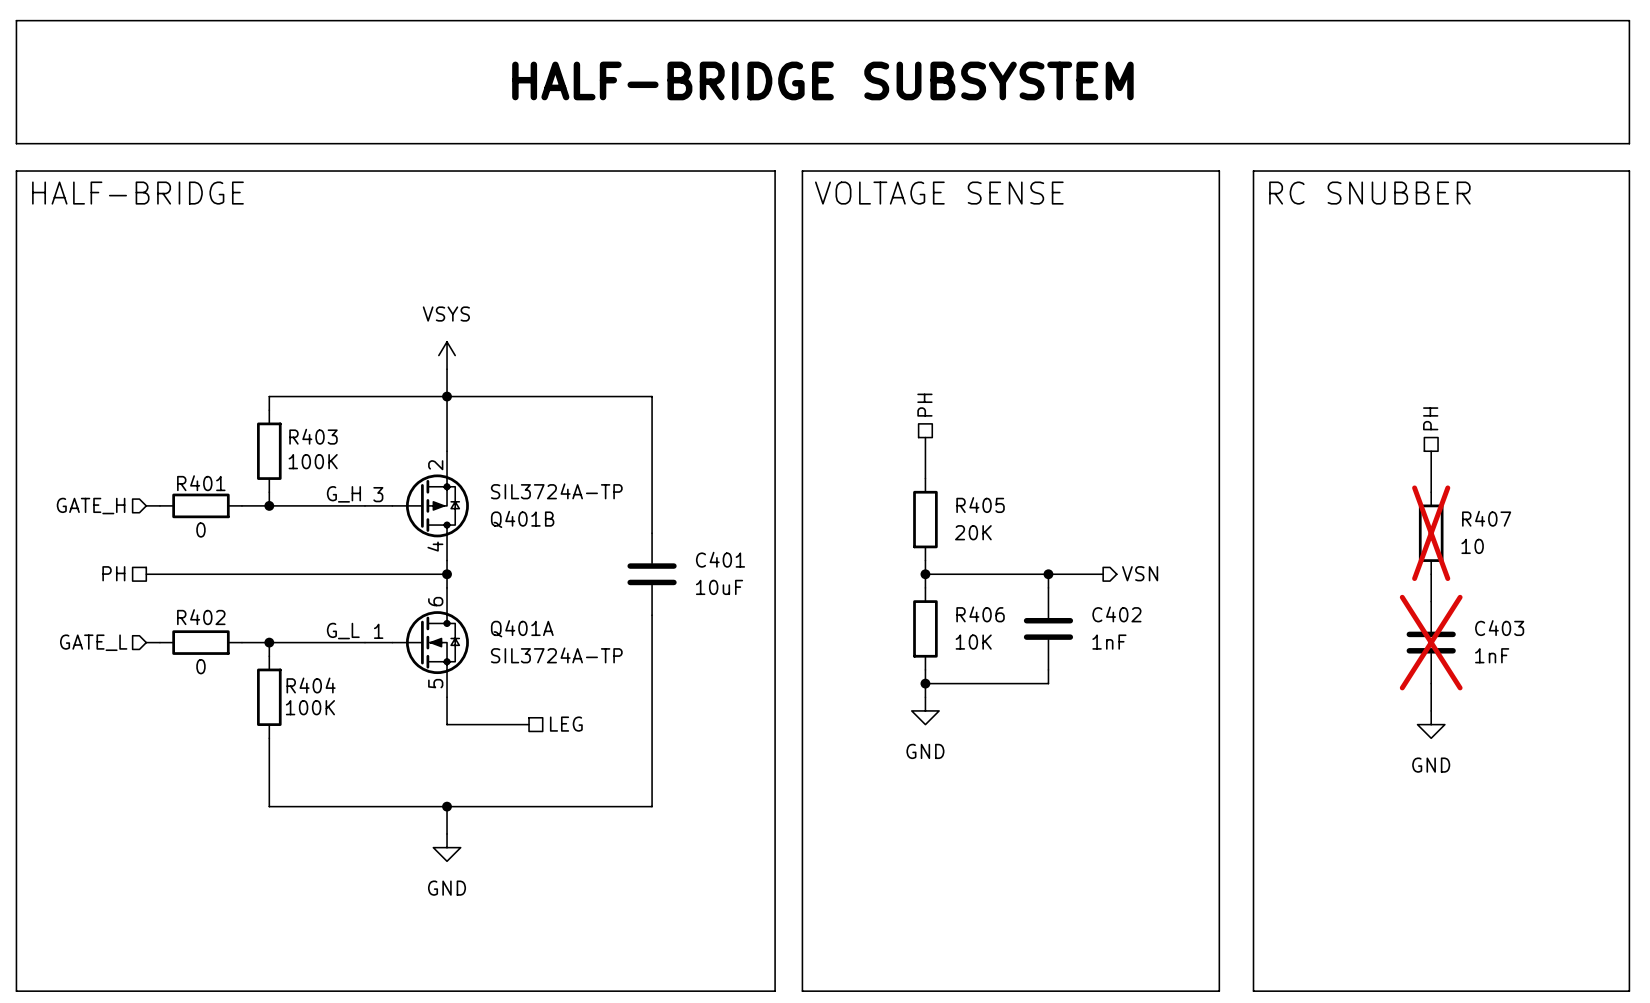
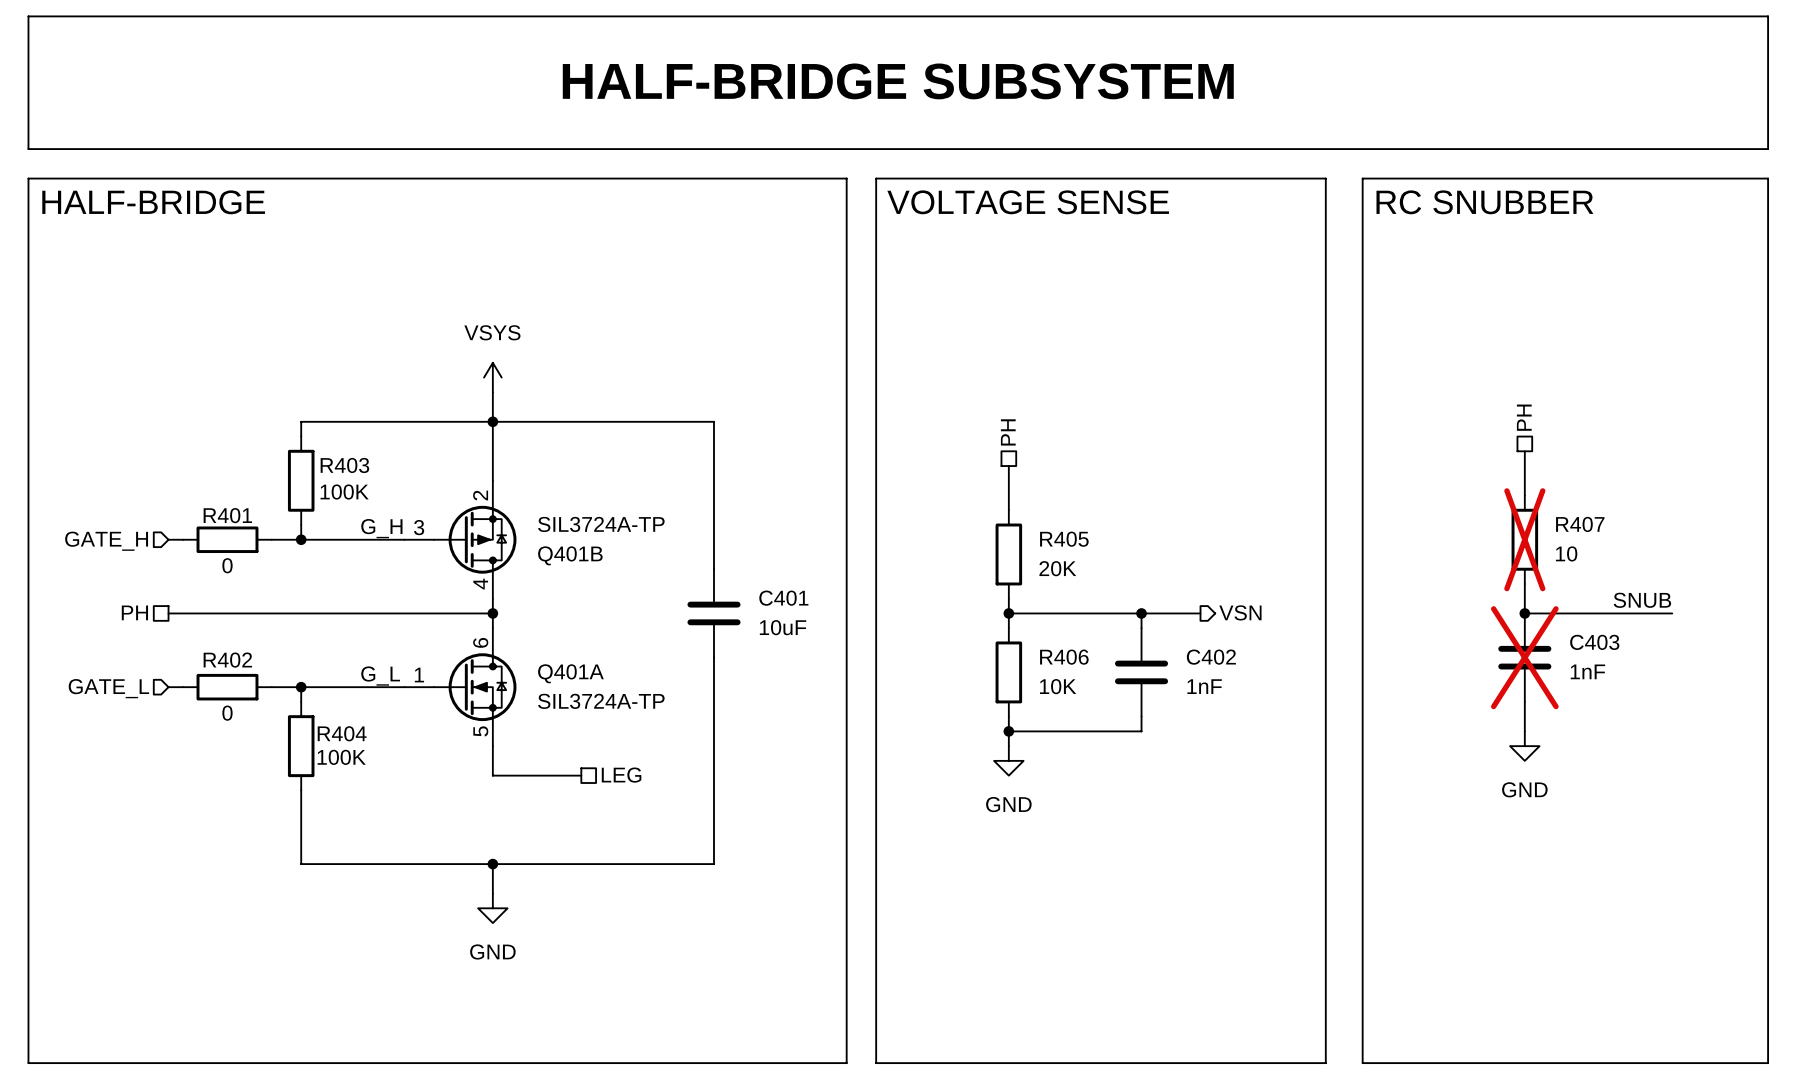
hierarchical label position: PH (1430, 418) -> PH (1524, 417)
wire: (1431, 451) (1431, 492) -> (1524, 451) (1524, 495)
R407 position: (1431, 533) -> (1524, 539)
wire: none -> (1524, 583) (1524, 613) (1672, 613)
label: none -> SNUB (1642, 600)
junction: none -> (1524, 613)
wire: (1431, 574) (1431, 601) -> none
C403 position: (1431, 642) -> (1524, 657)
wire: (1431, 683) (1431, 710) -> (1524, 701) (1524, 731)
power symbol position: GND (1431, 724) -> GND (1524, 746)

